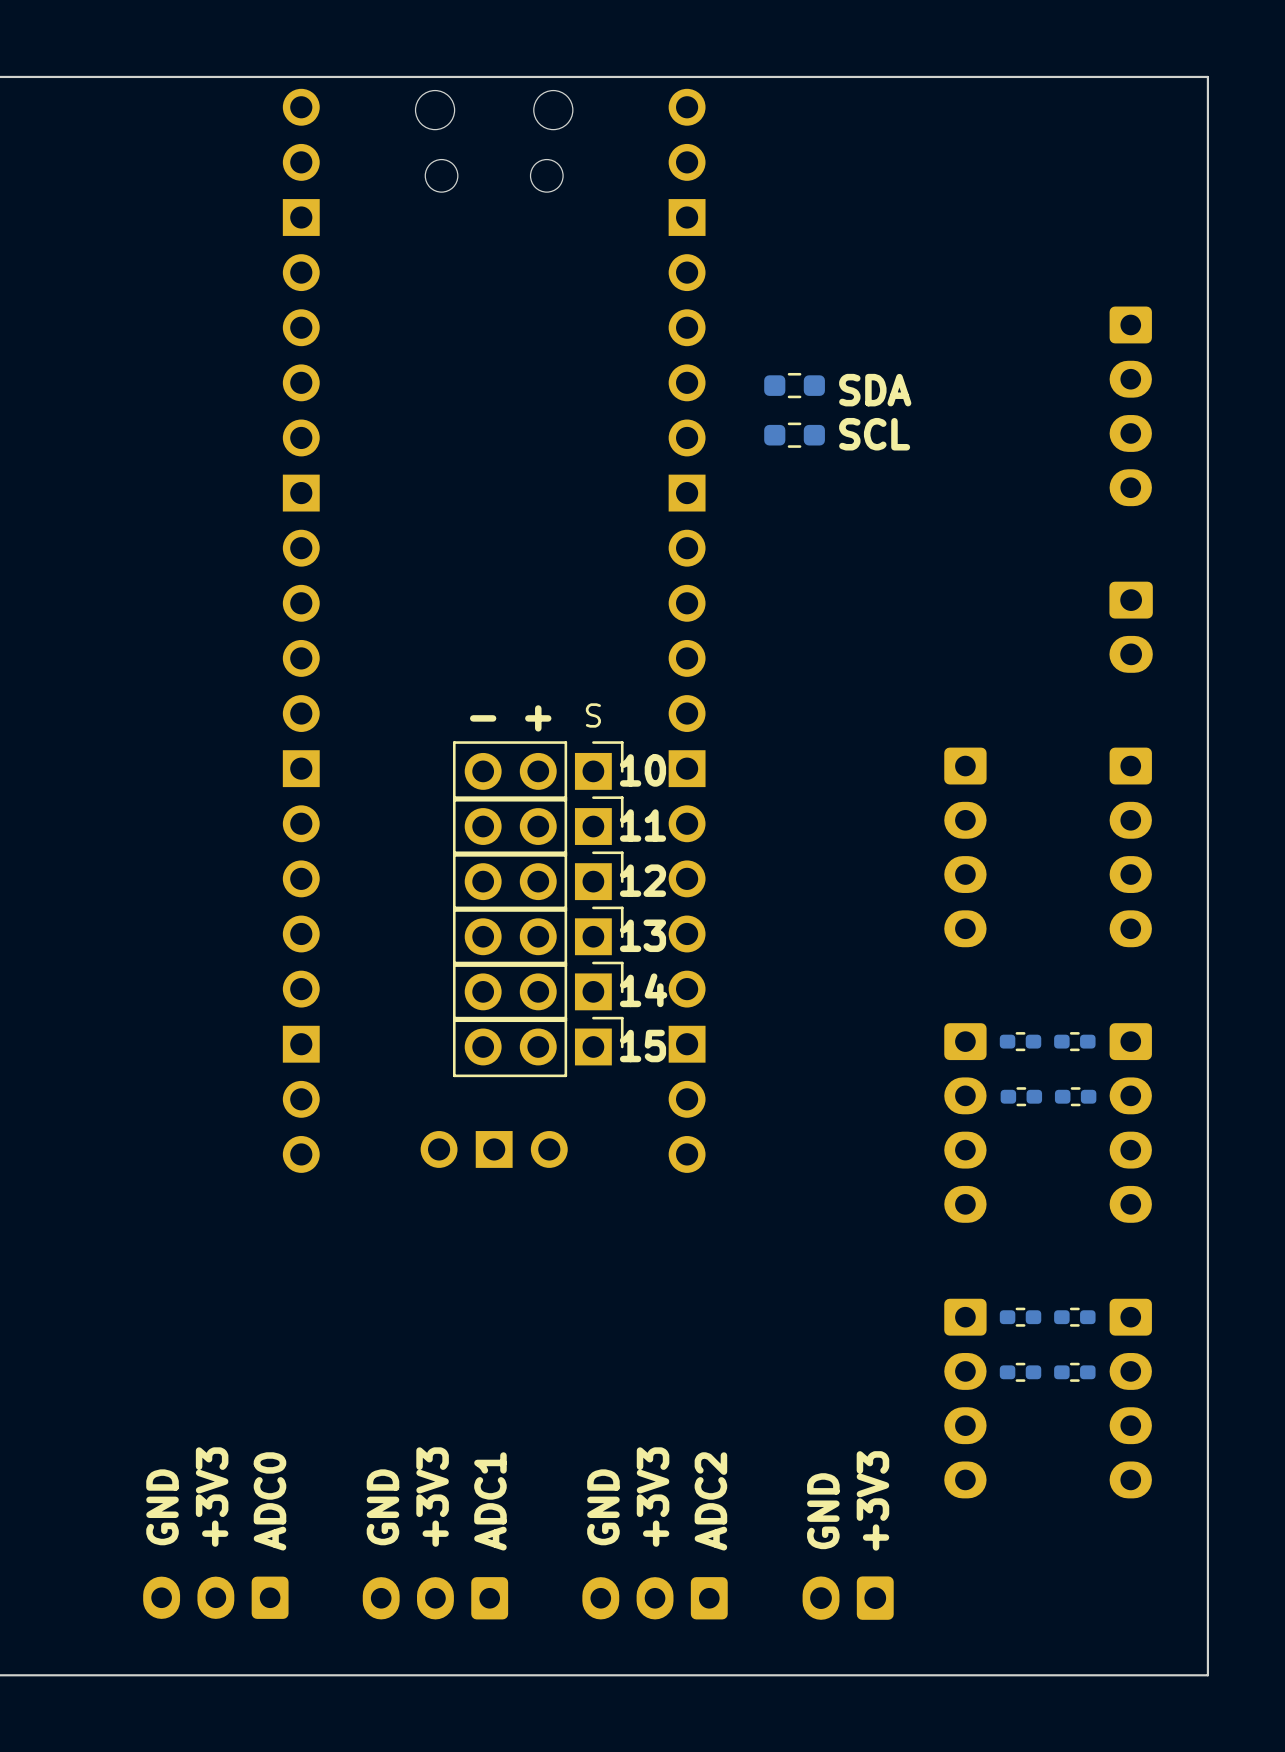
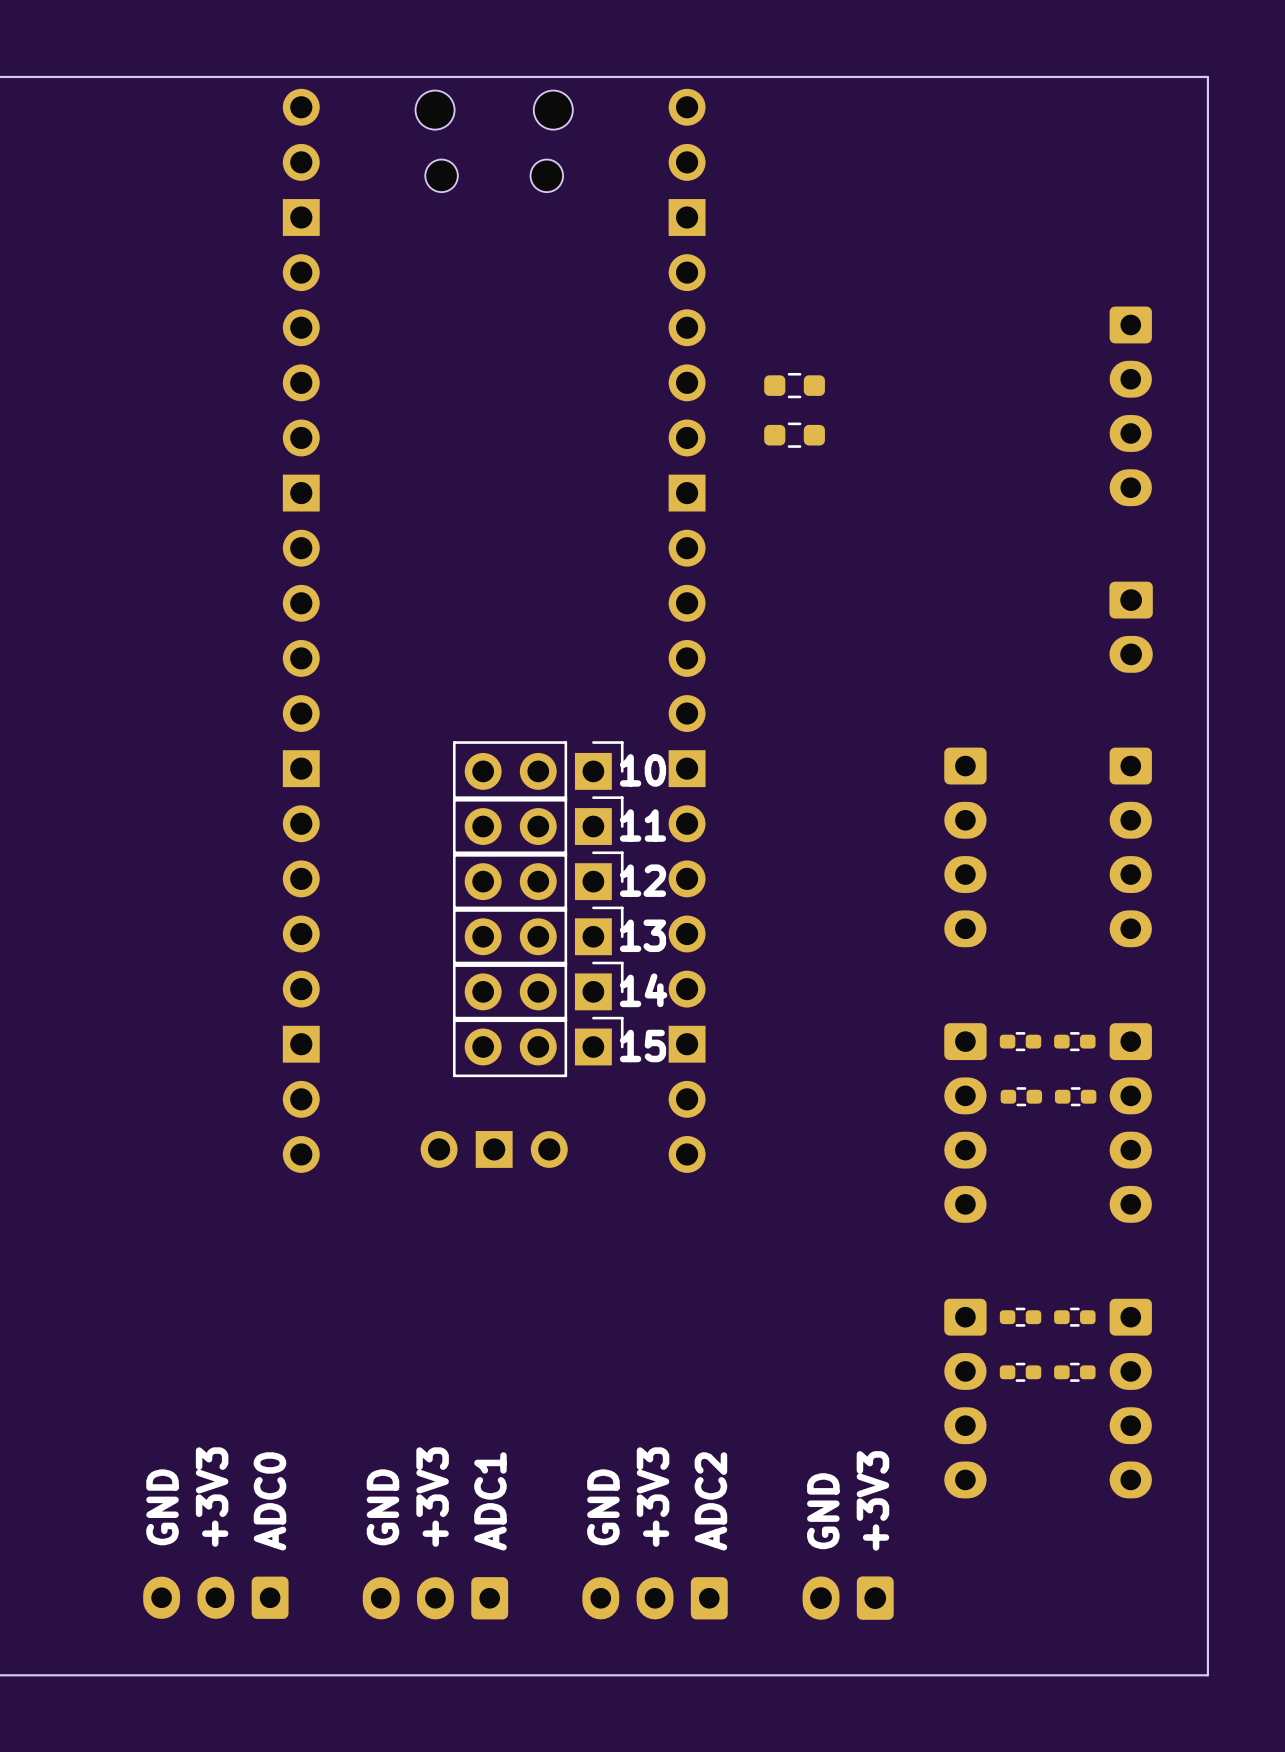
text: SDA (875, 390) -> none
text: SCL (874, 434) -> none
text: S (593, 715) -> none
text: - (483, 718) -> none
text: + (538, 718) -> none

